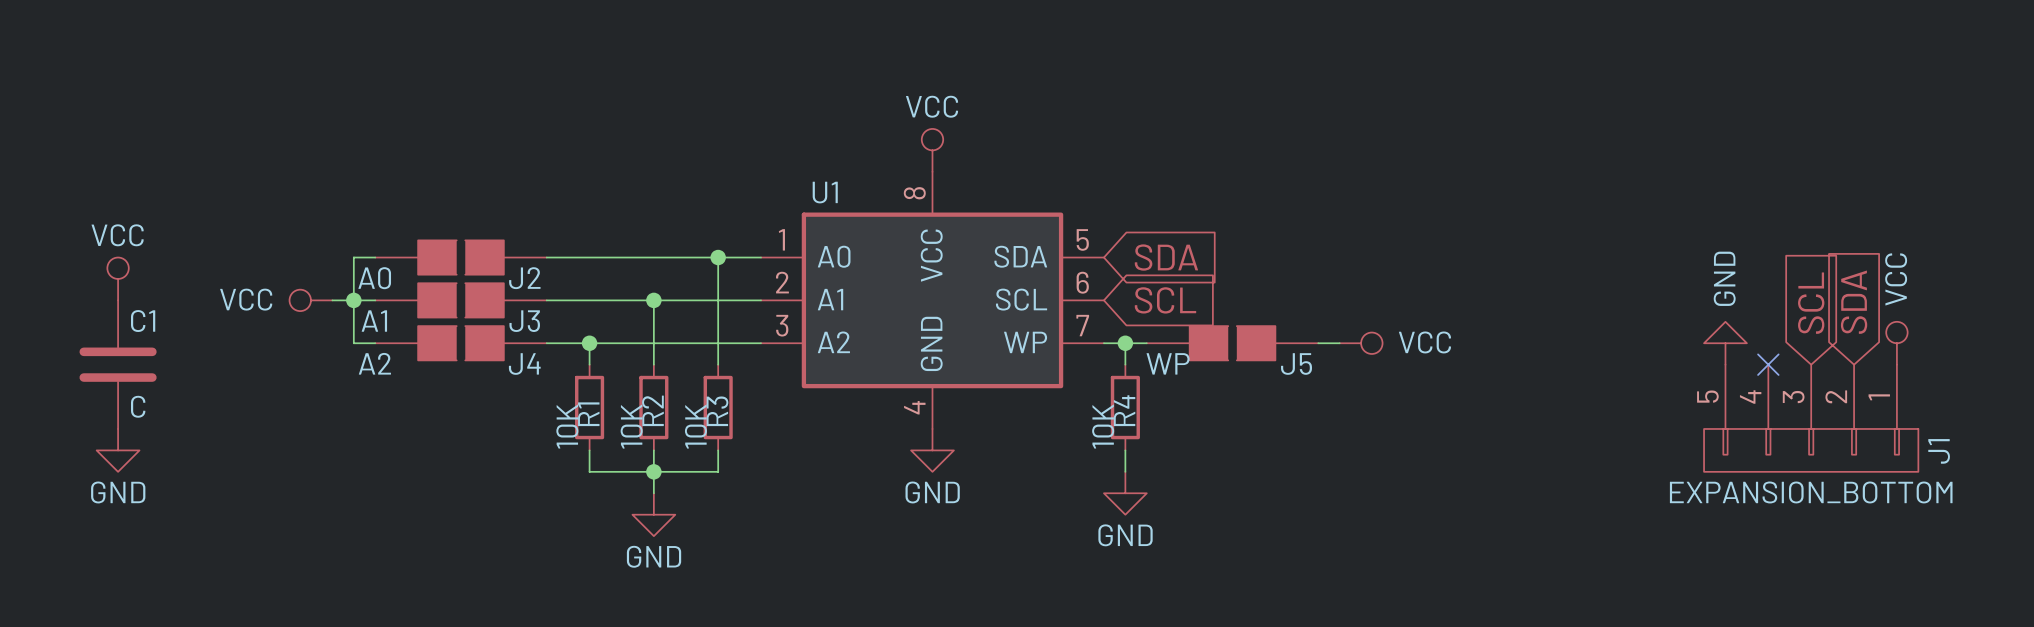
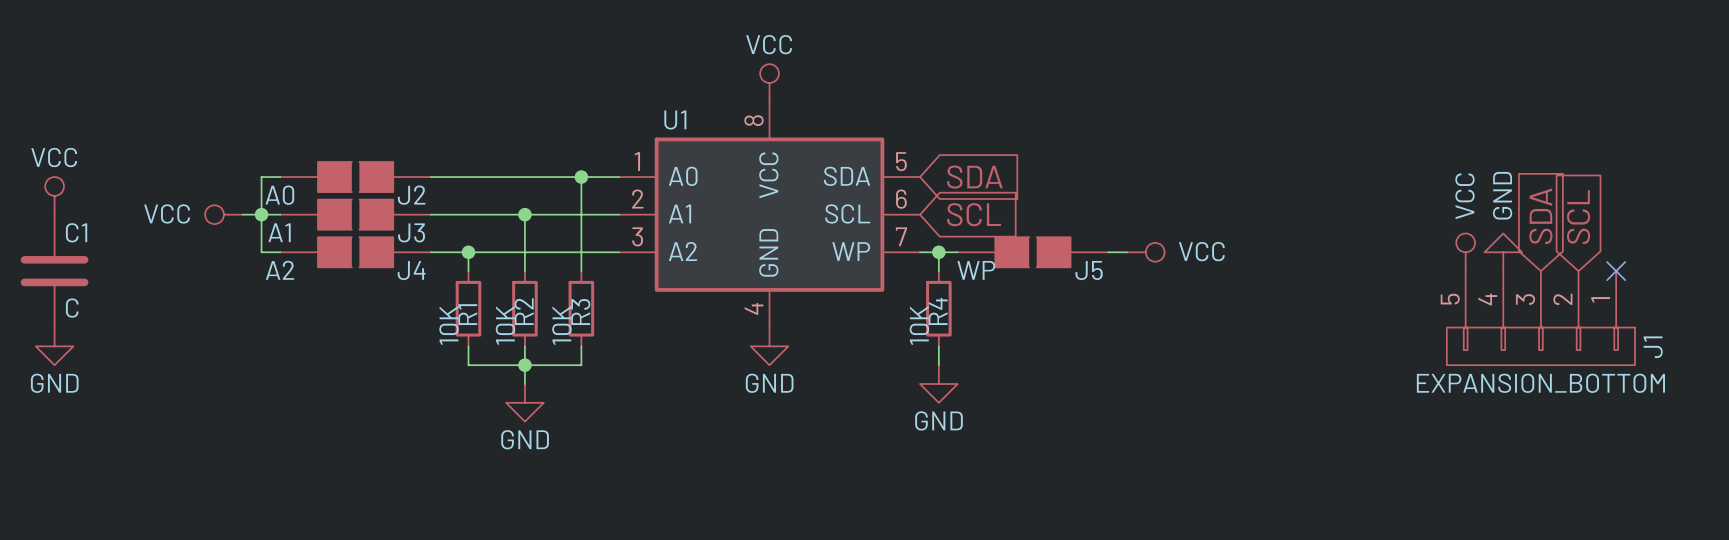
global label: SDA (1854, 302) -> SCL (1578, 217)
global label: SCL (1811, 303) -> SDA (1540, 216)
power symbol: GND (1725, 343) -> VCC (1465, 252)
power symbol: none -> GND (1503, 252)
power symbol: VCC (1896, 343) -> none
no-connect mark: (1768, 364) -> none
no-connect mark: none -> (1616, 271)

